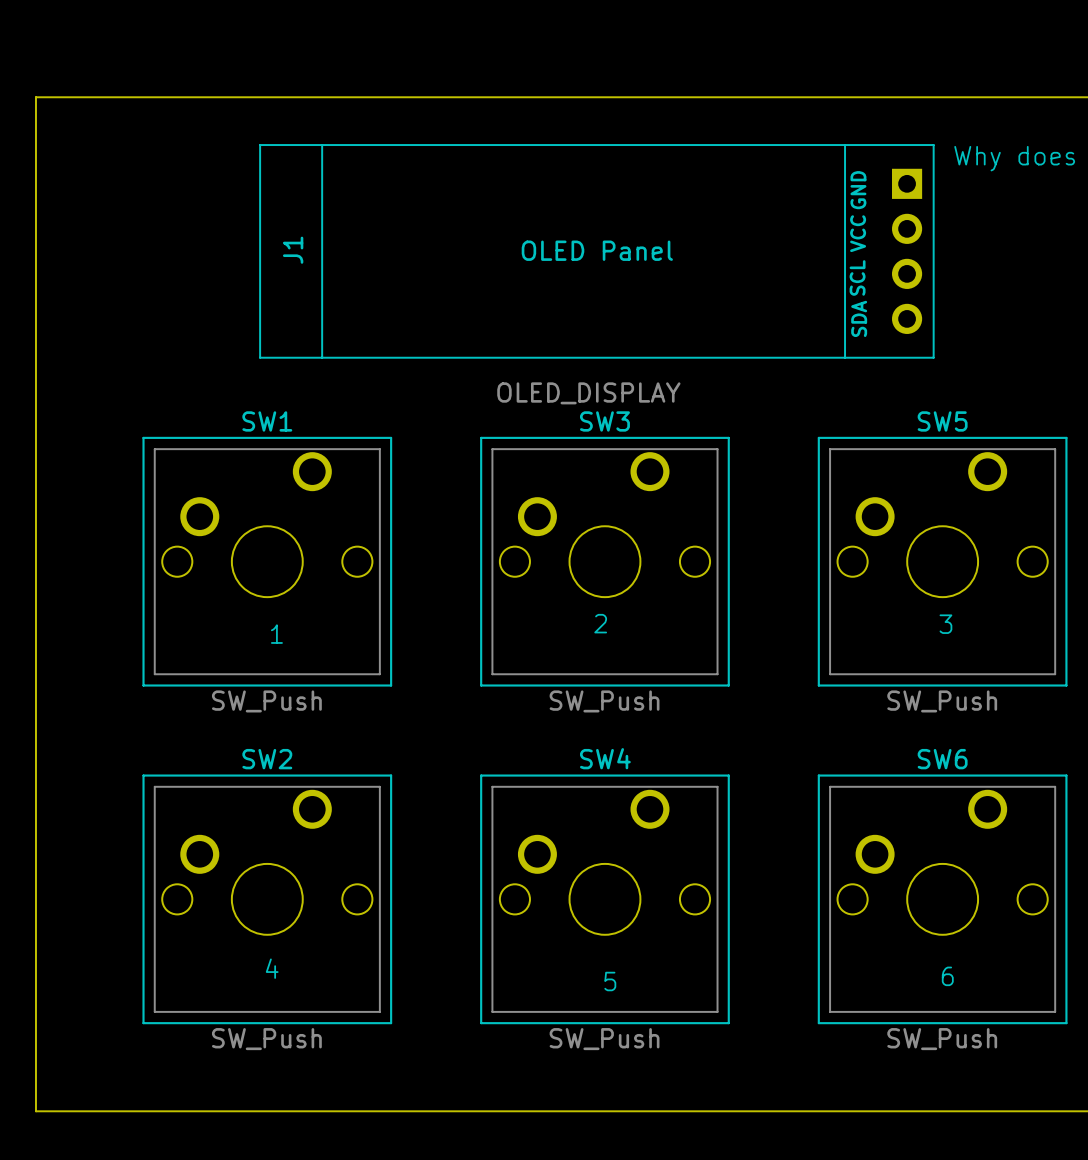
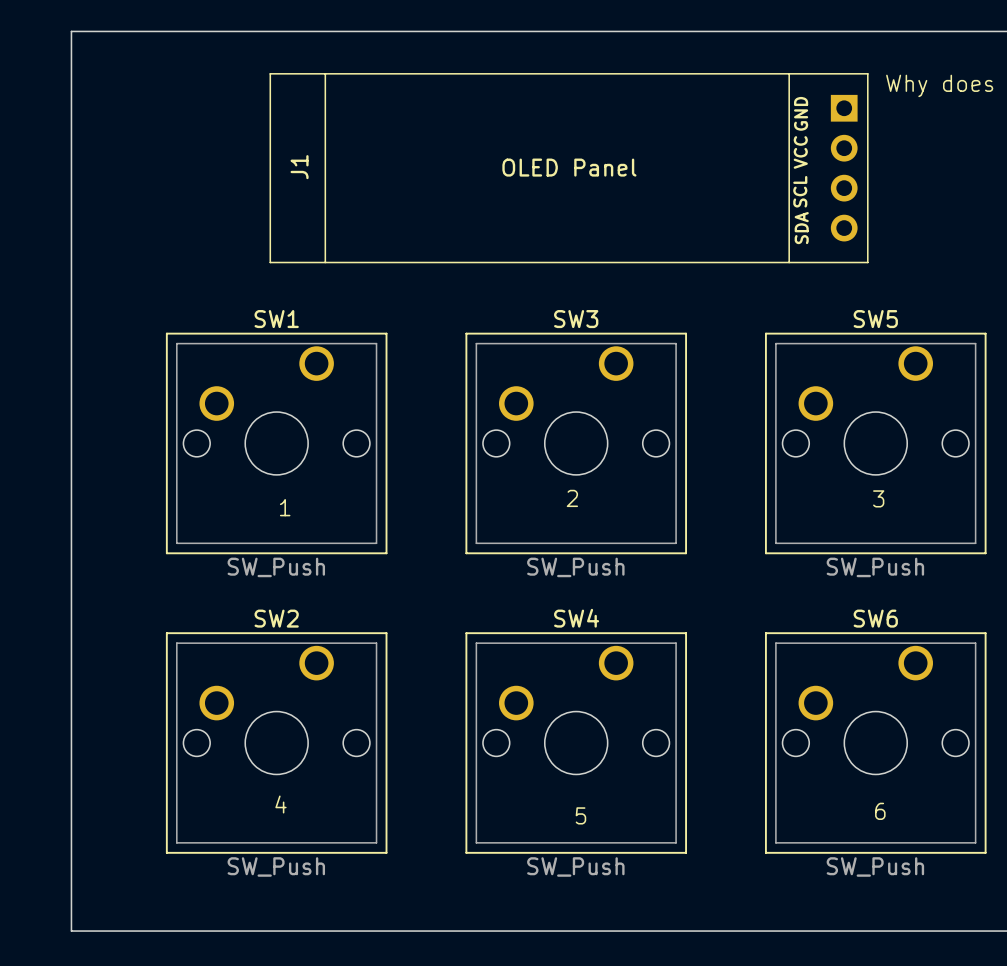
J1 value: OLED_DISPLAY (588, 393) -> none

